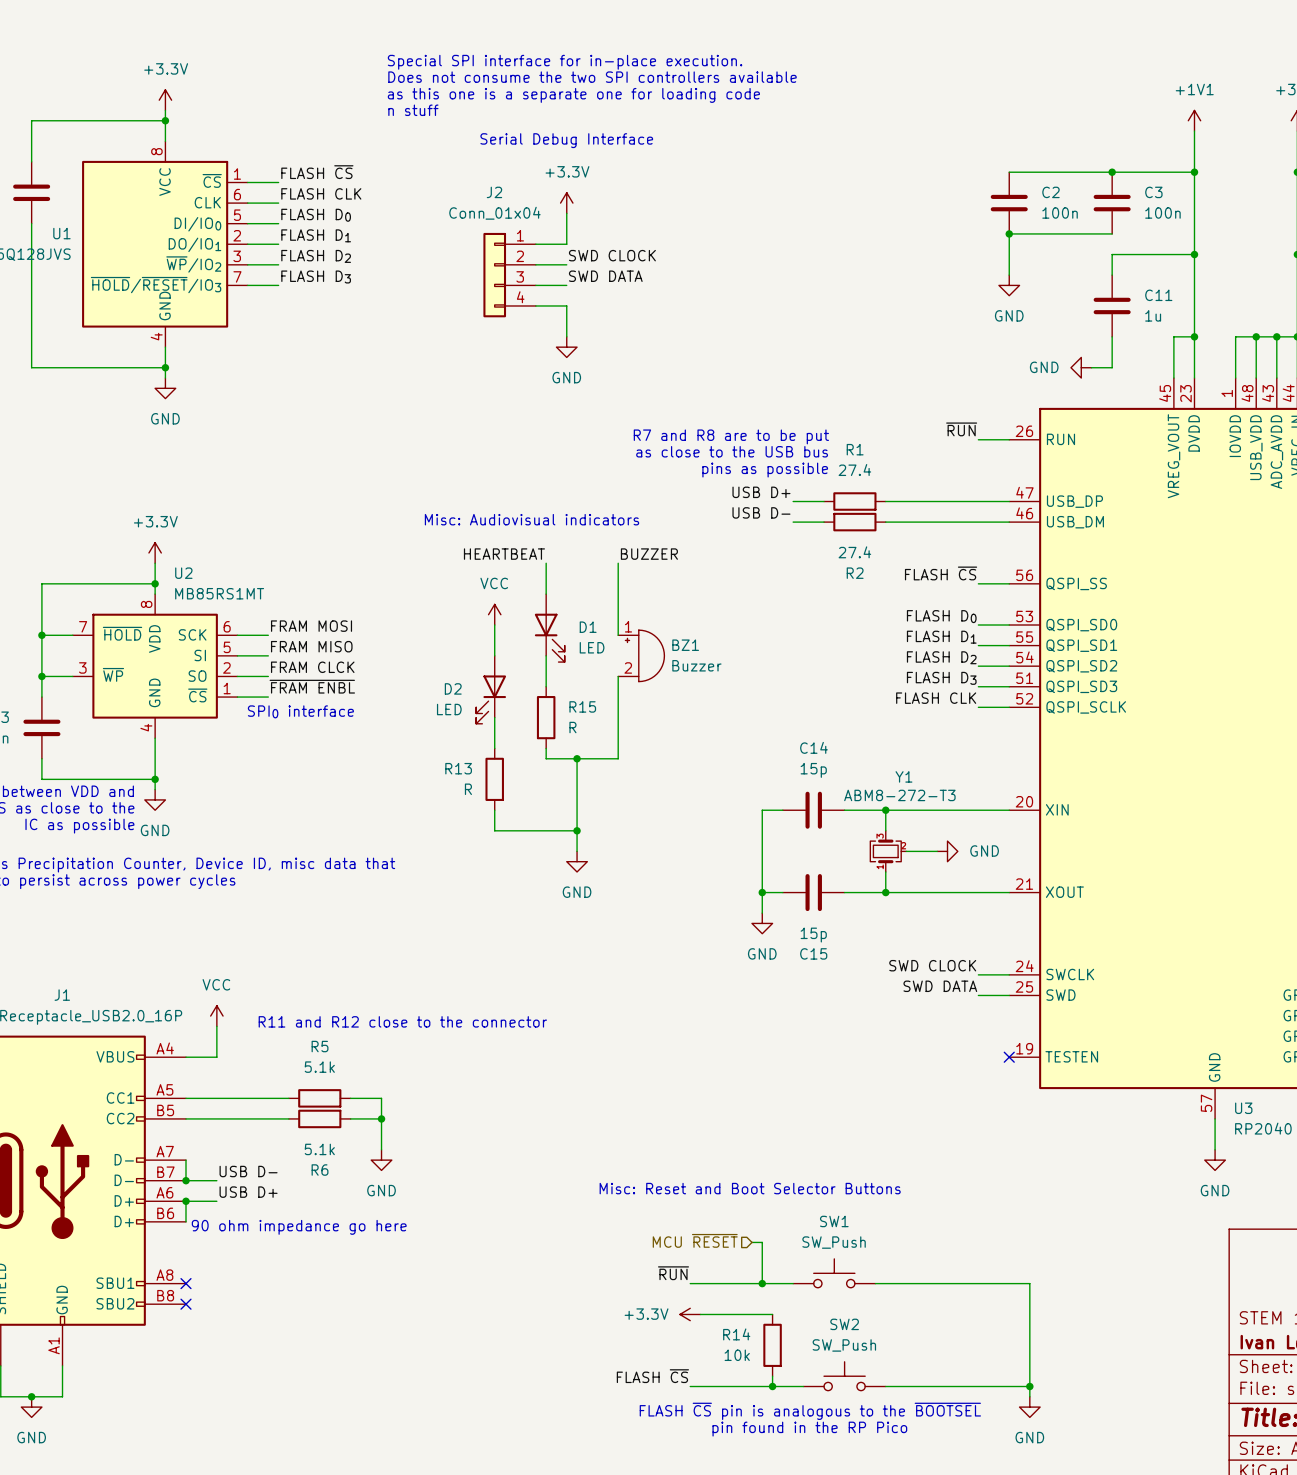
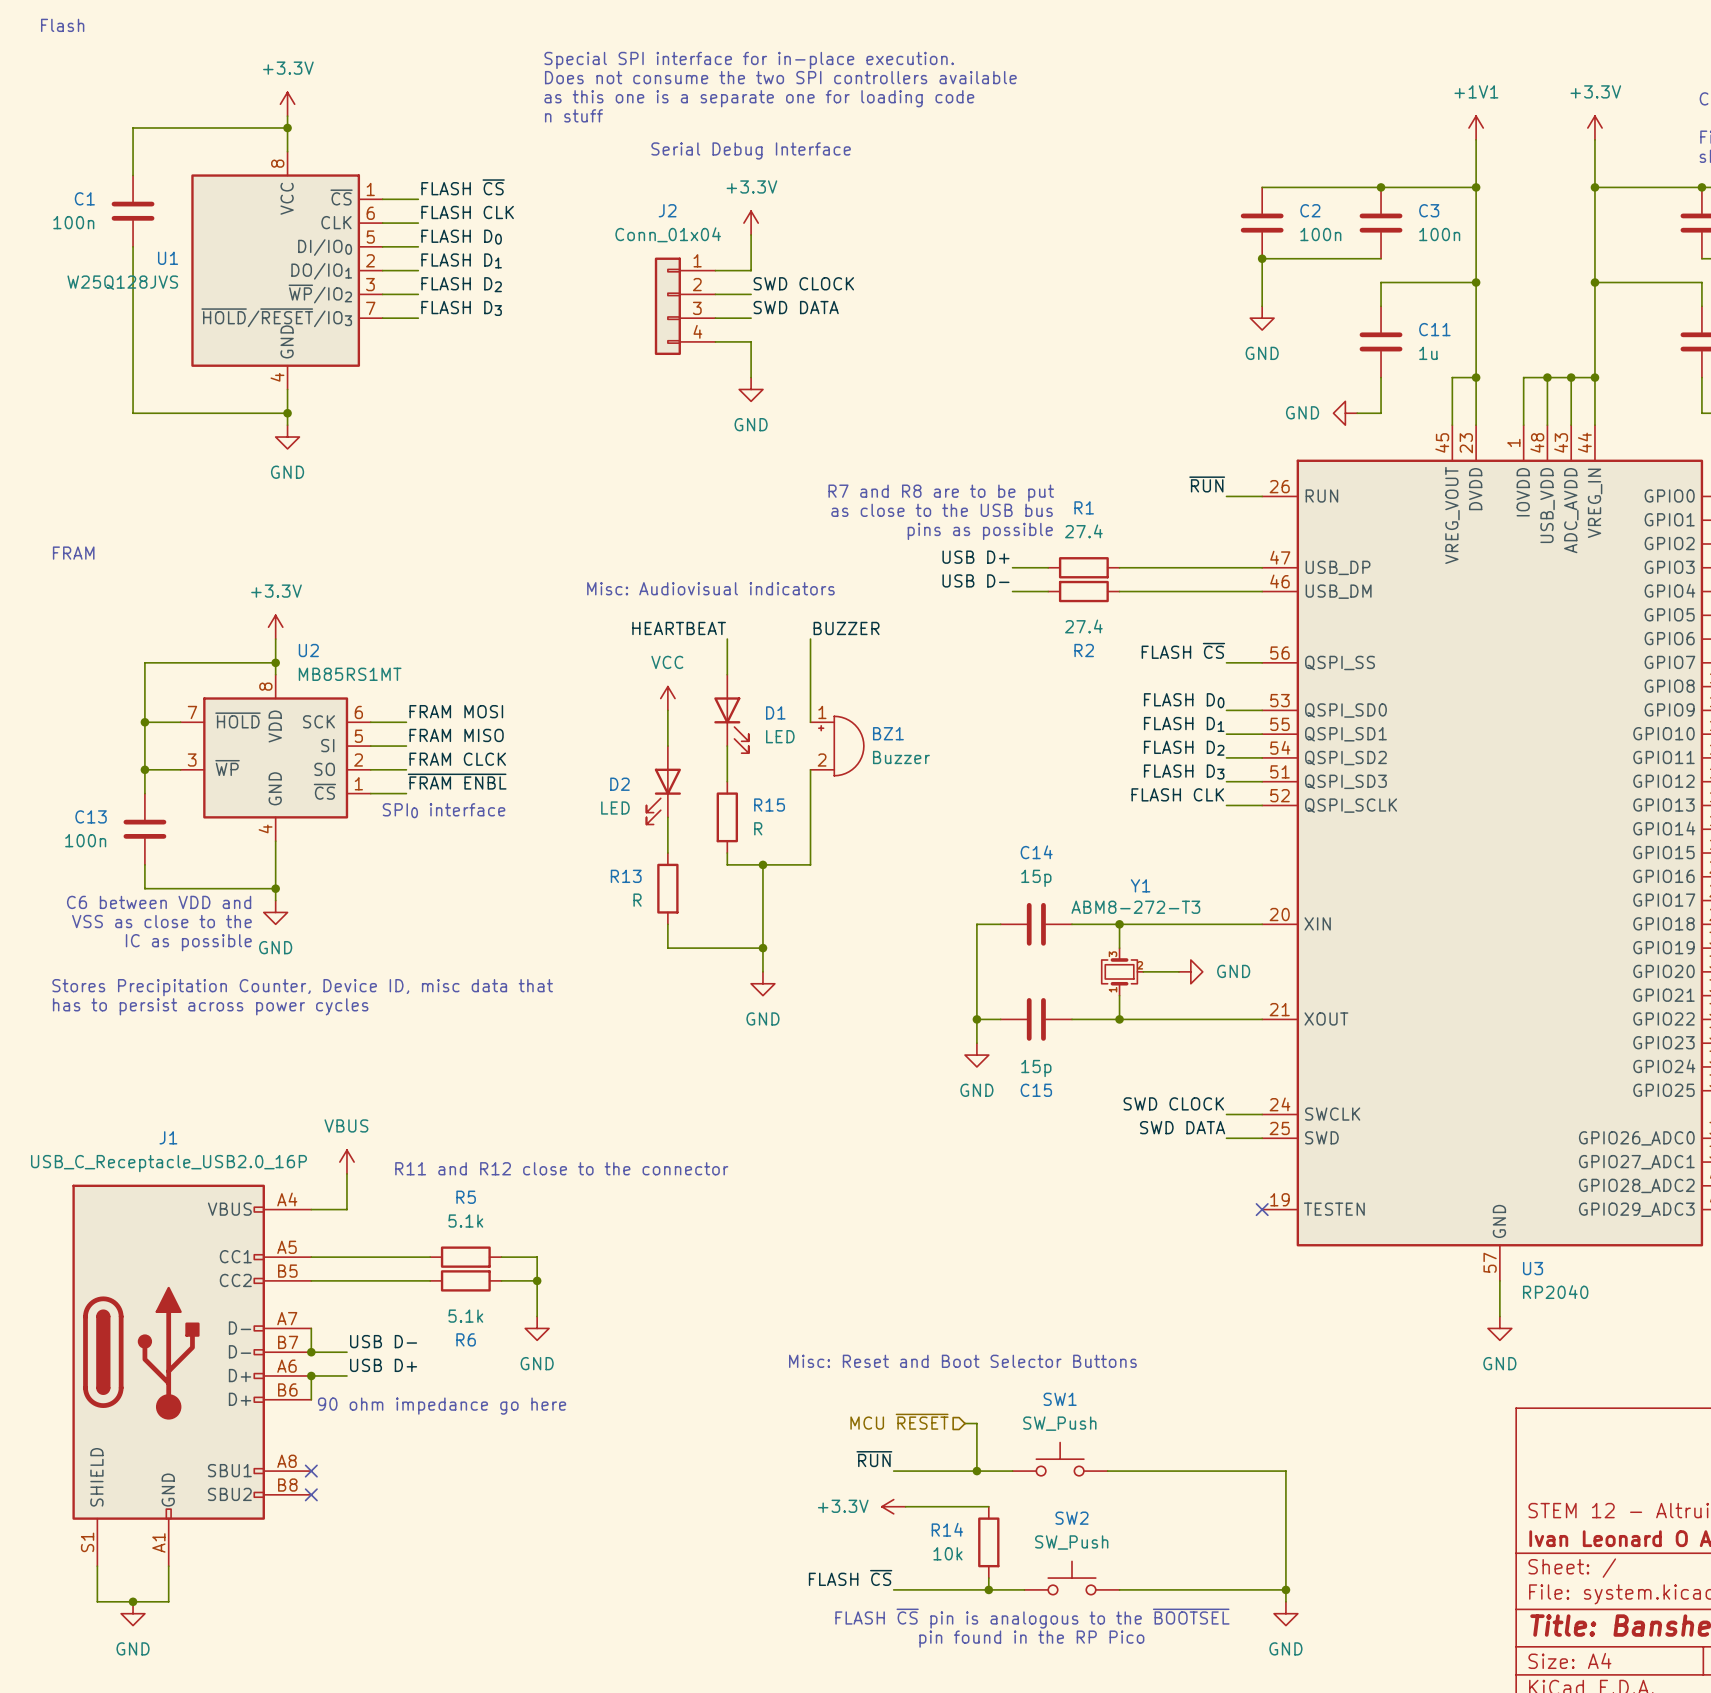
power symbol: VCC (216, 1016) -> VBUS (346, 1162)

